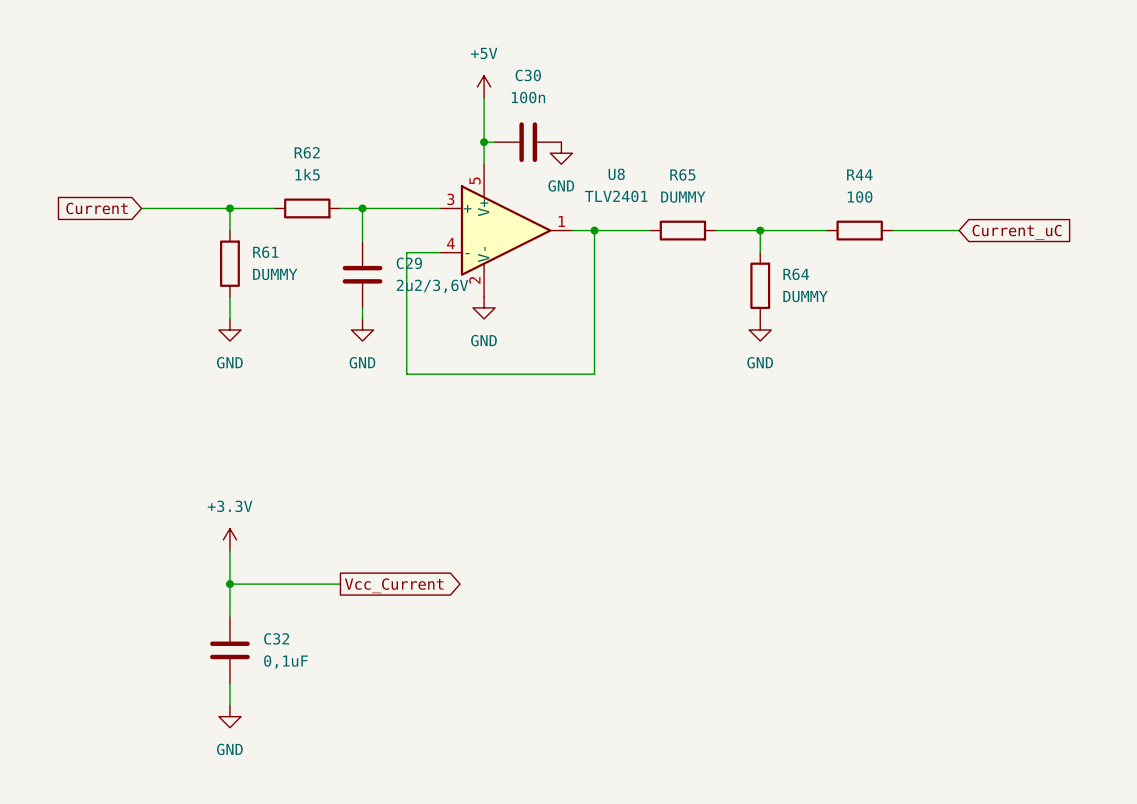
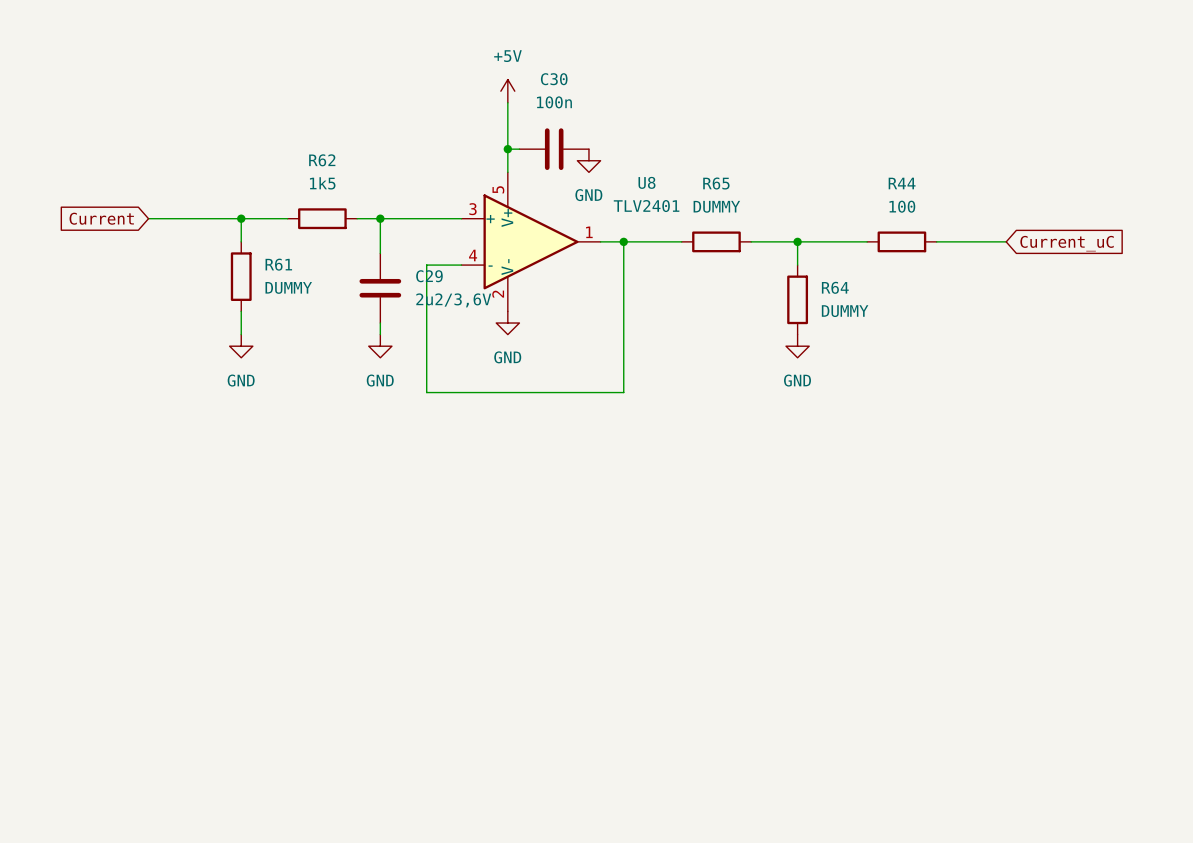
power symbol: +3.3V (229, 539) -> none
wire: (229, 550) (229, 617) -> none
wire: (229, 584) (340, 584) -> none
junction: (229, 584) -> none
global label: Vcc_Current (394, 585) -> none
C32: 0,1uF (229, 650) -> none
wire: (229, 683) (229, 705) -> none
power symbol: GND (229, 716) -> none

